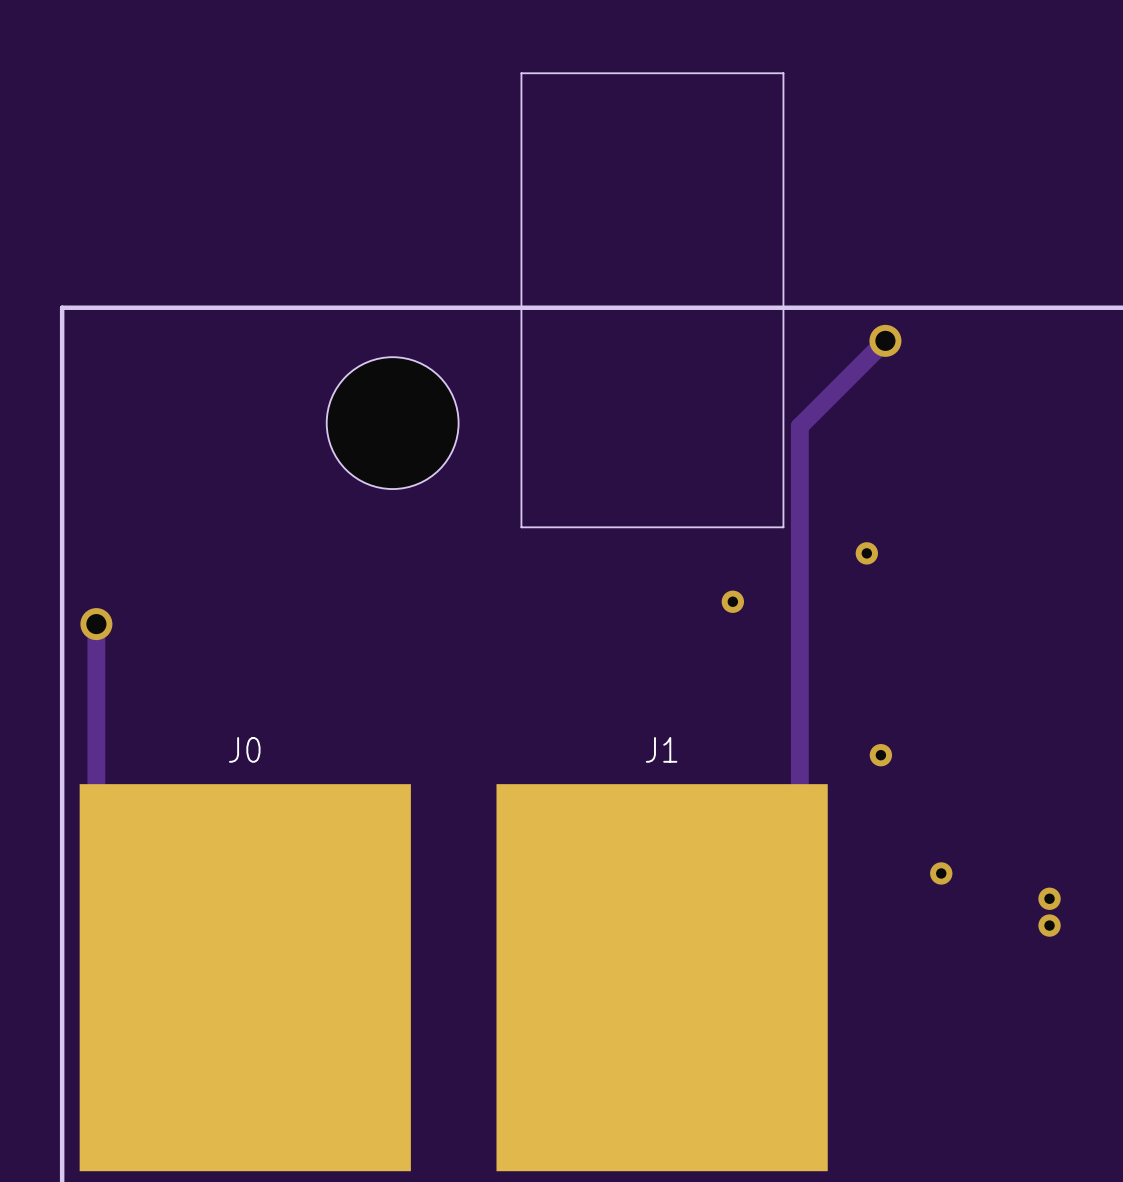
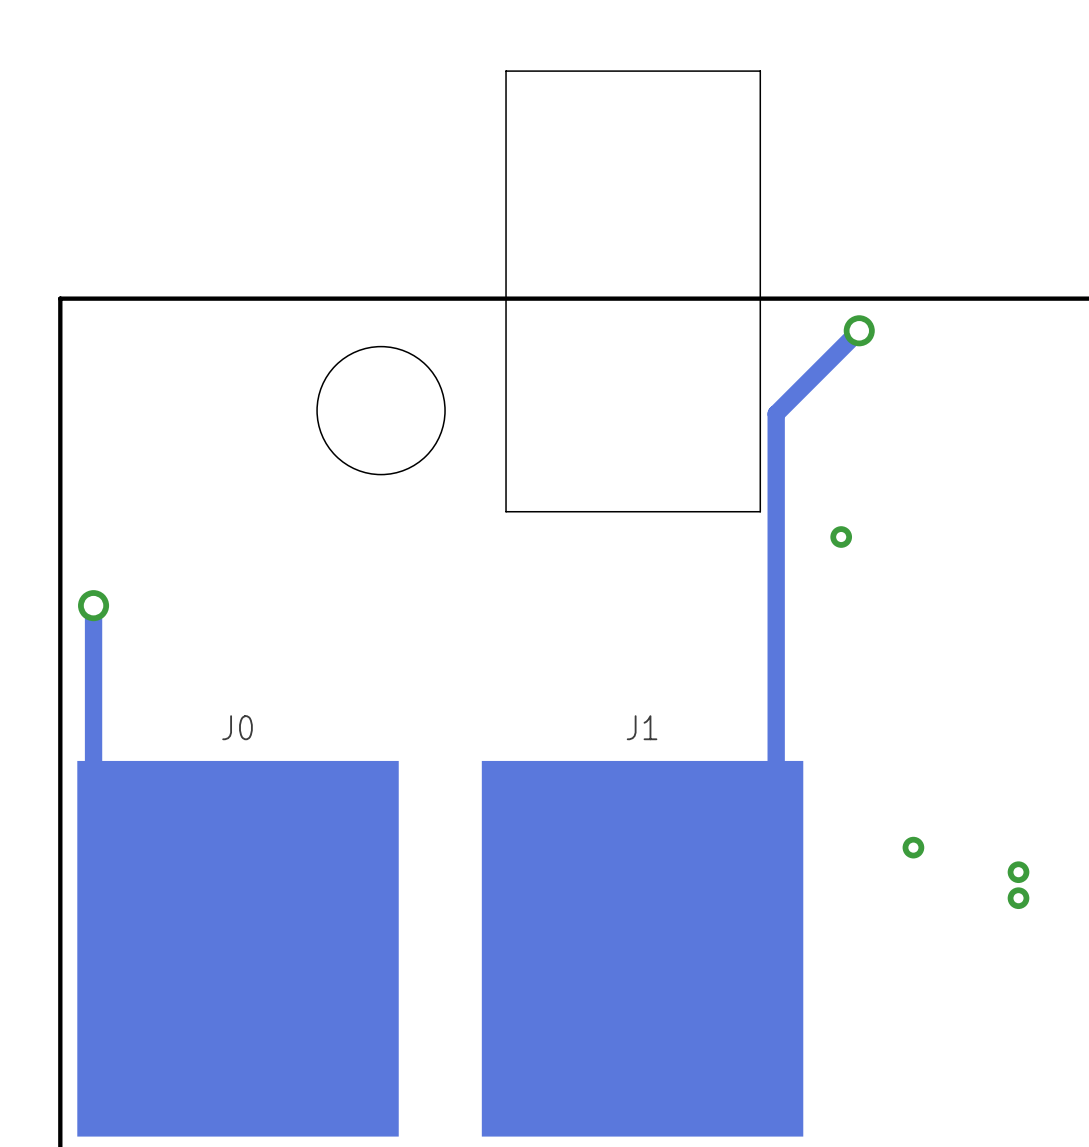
via: (732, 601) -> none
via: (880, 755) -> none

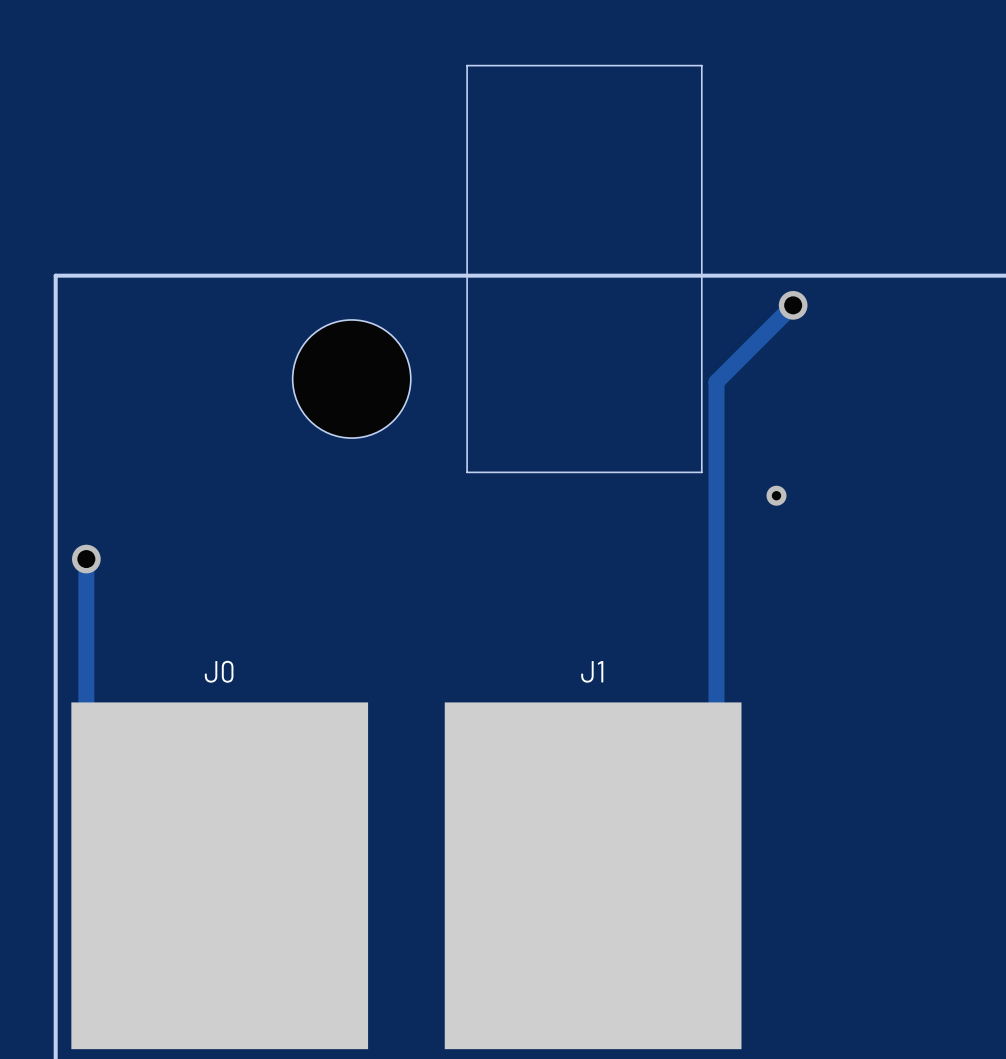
via: (913, 847) -> none
via: (1018, 872) -> none
via: (1018, 898) -> none

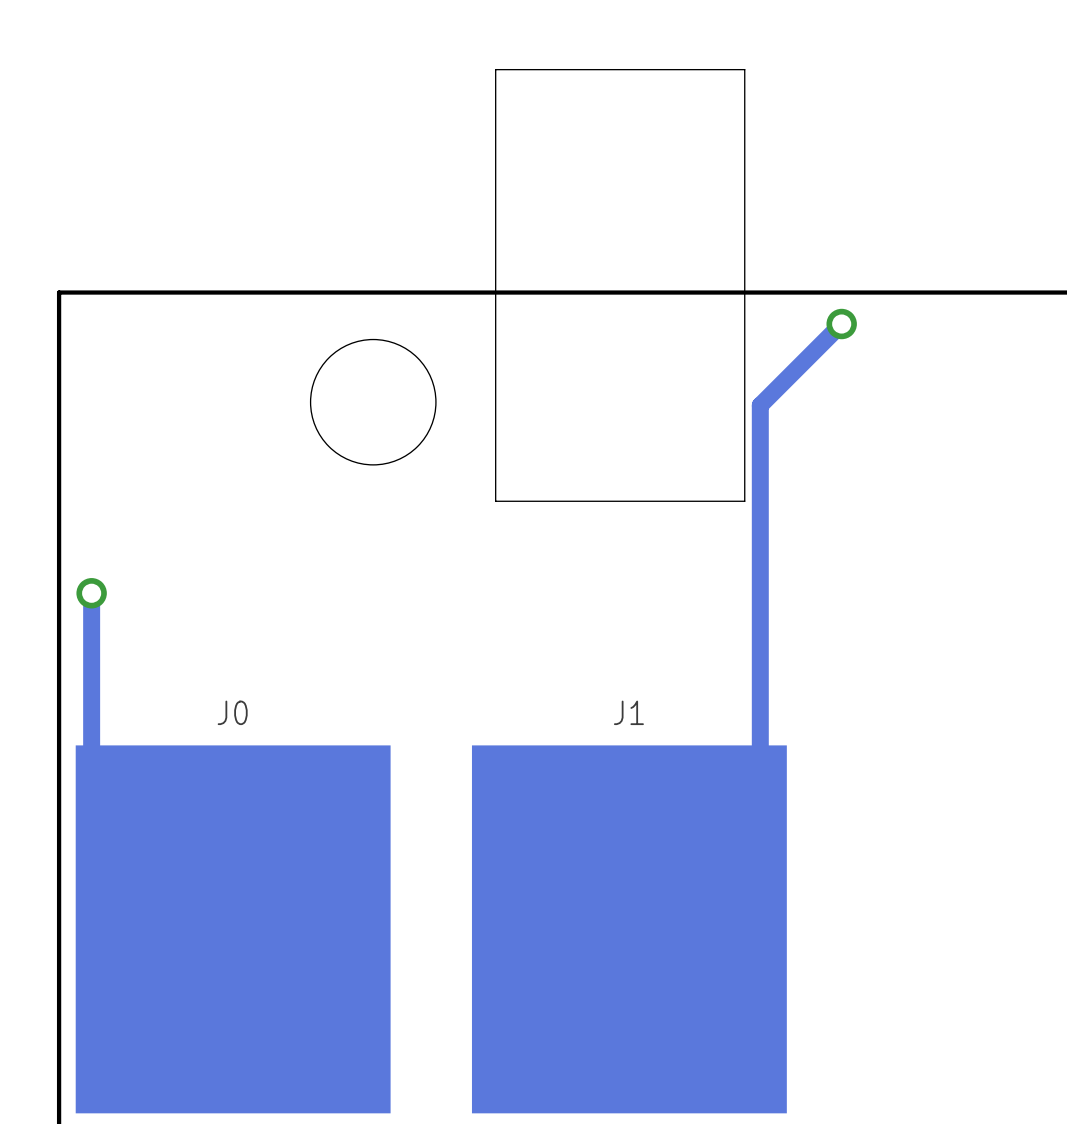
via: (776, 495) -> none

